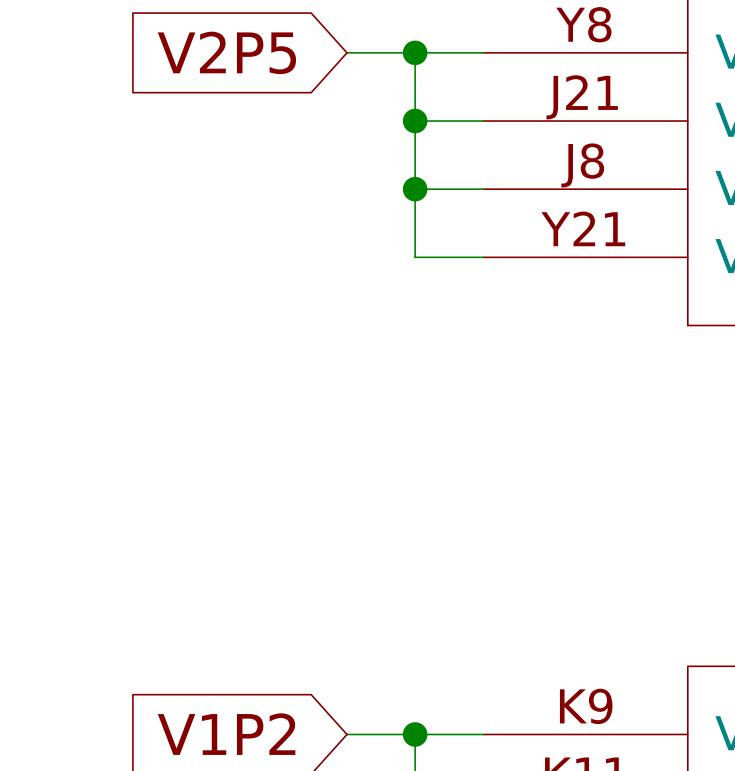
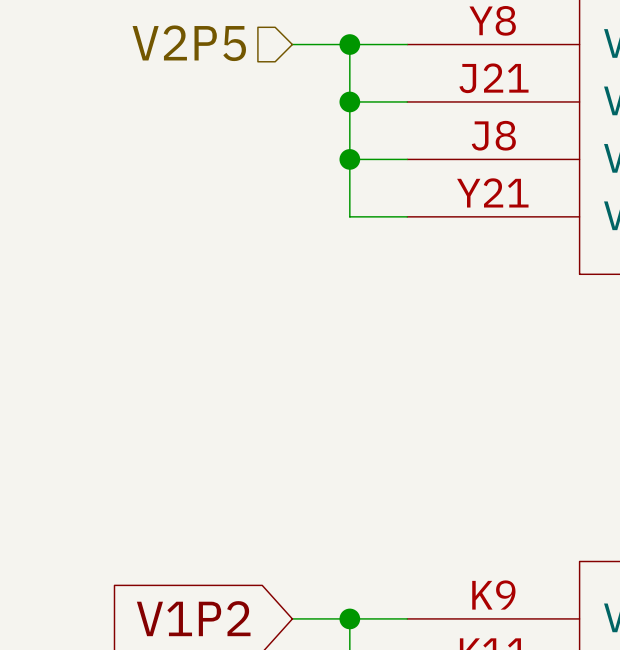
hierarchical label: none -> V2P5 (189, 43)
global label: V2P5 (226, 52) -> none

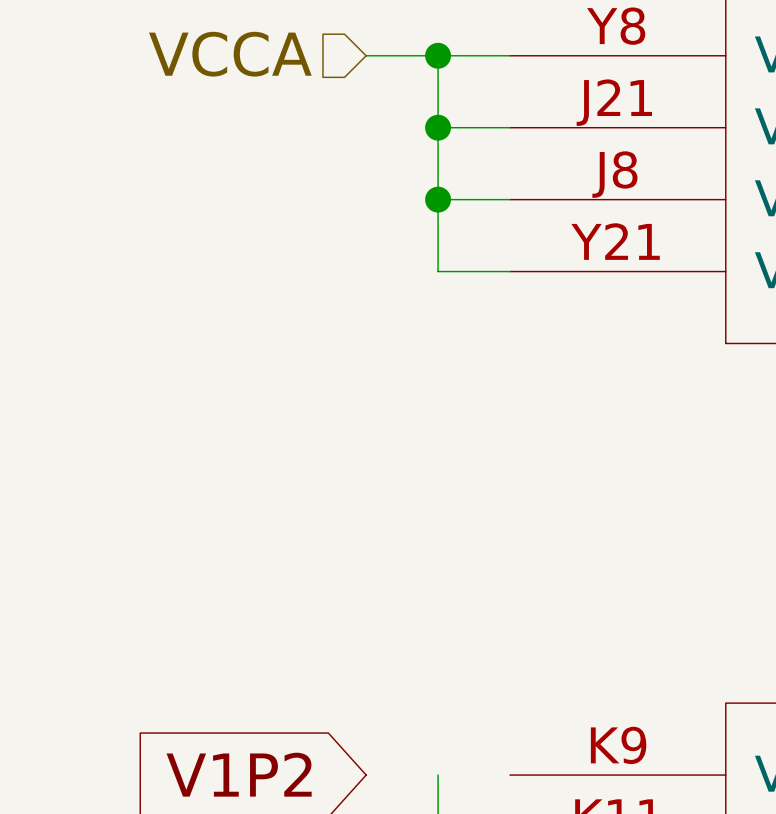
hierarchical label: V2P5 (189, 43) -> VCCA (230, 54)
wire: (292, 618) (407, 618) -> none
junction: (349, 618) -> none

